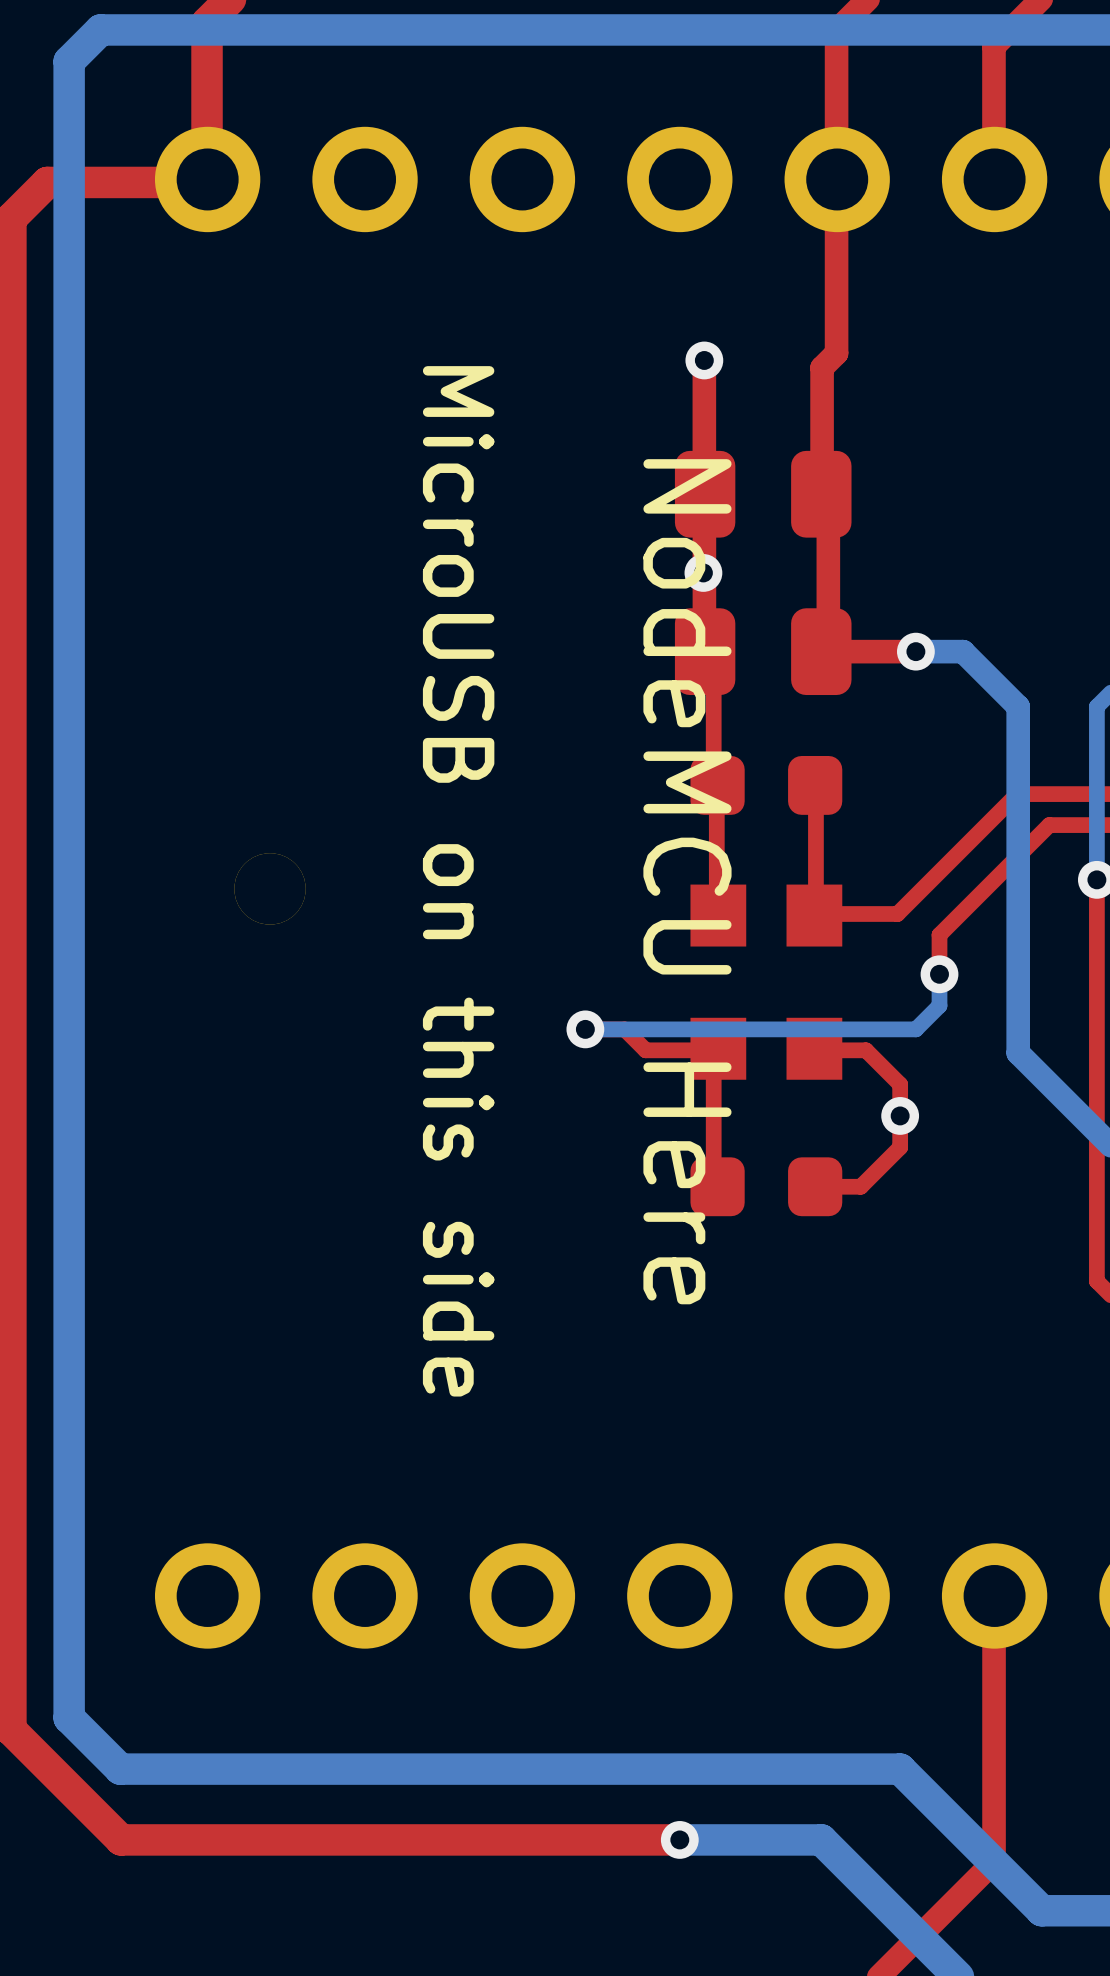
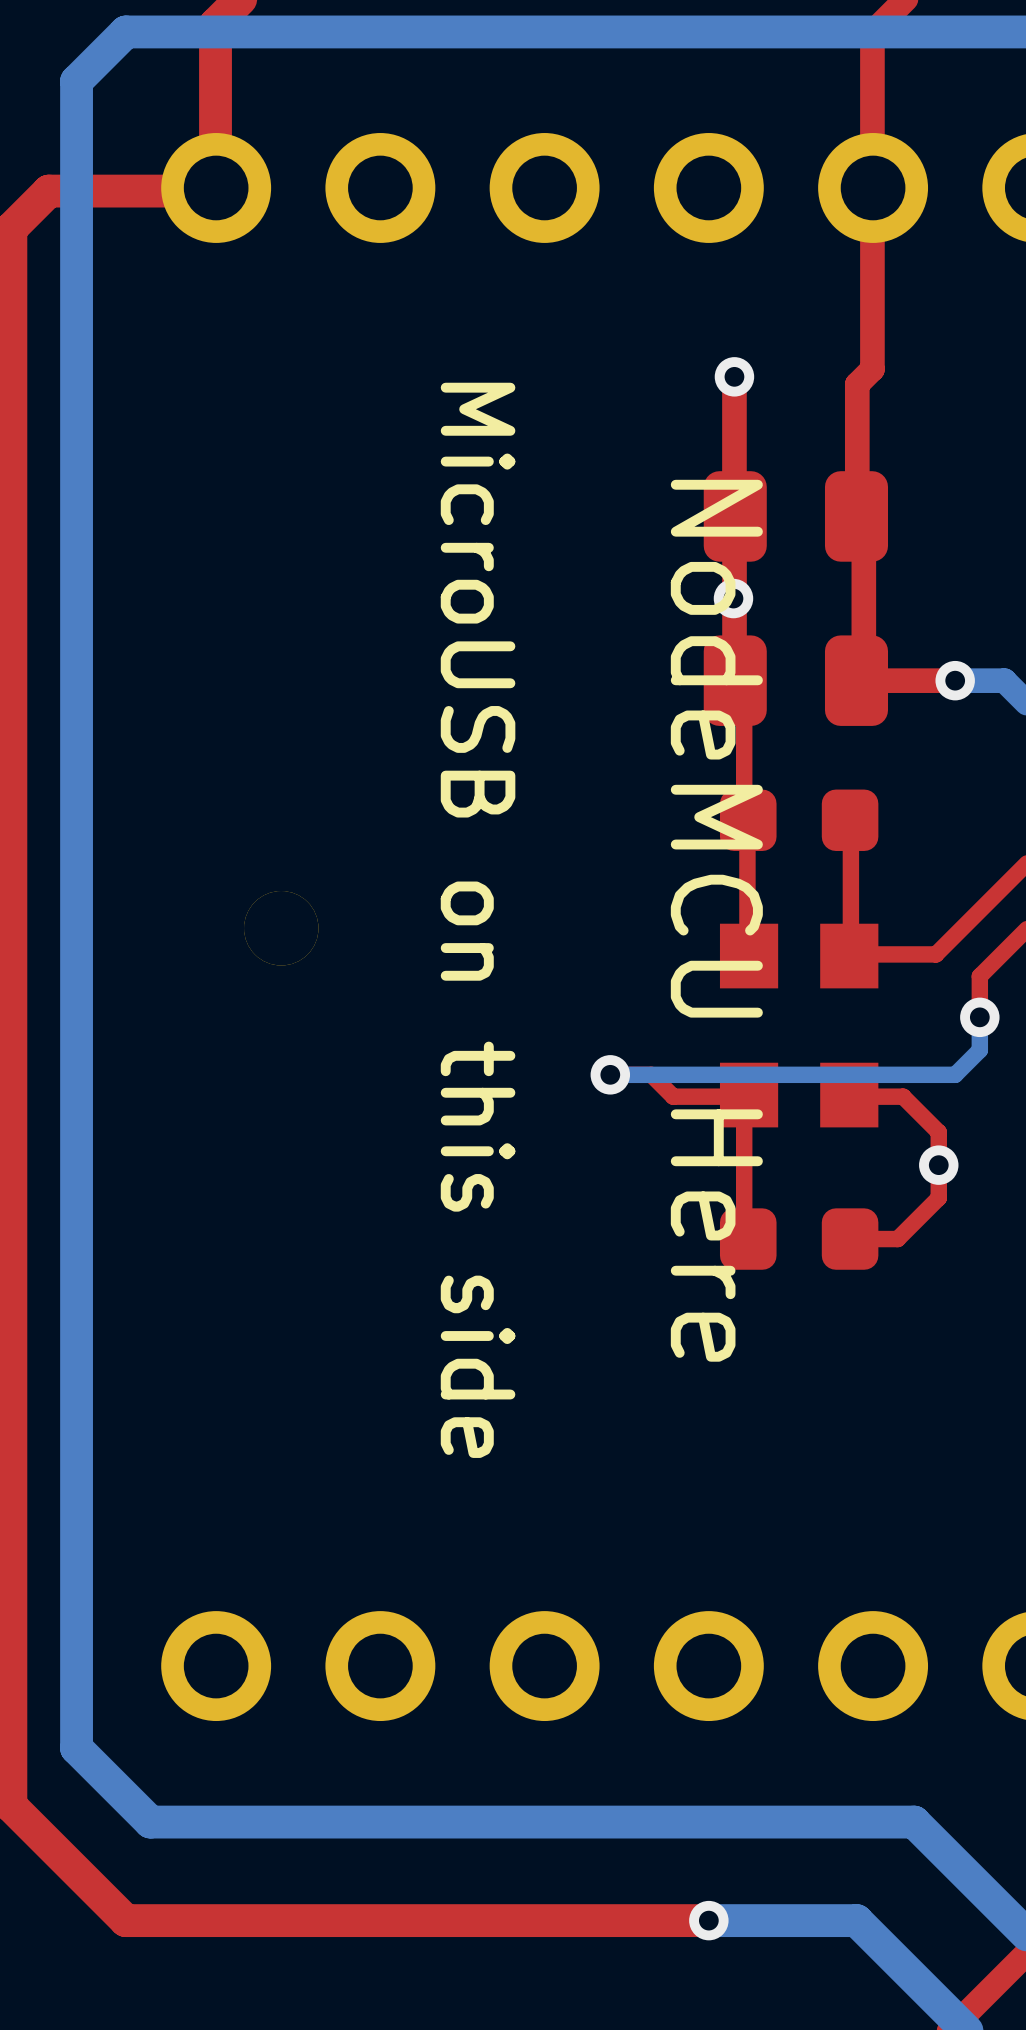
bottom track: (121, 29) (100, 29) (69, 61) (69, 1717) (120, 1769) (900, 1769) -> (125, 31) (76, 81) (76, 1748) (150, 1822) (914, 1822) (938, 1846)

